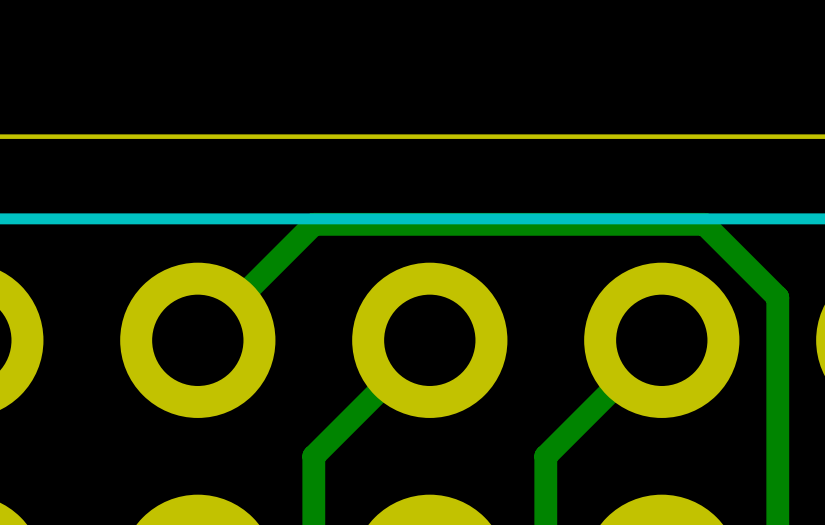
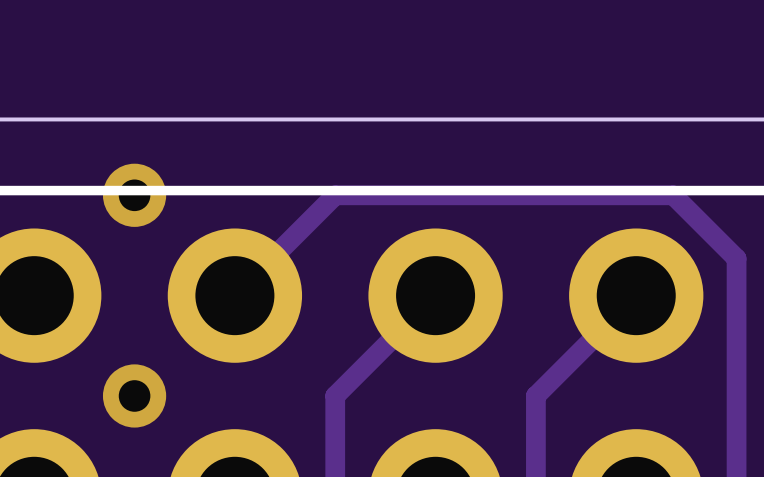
via: none -> (134, 195)
via: none -> (134, 395)

